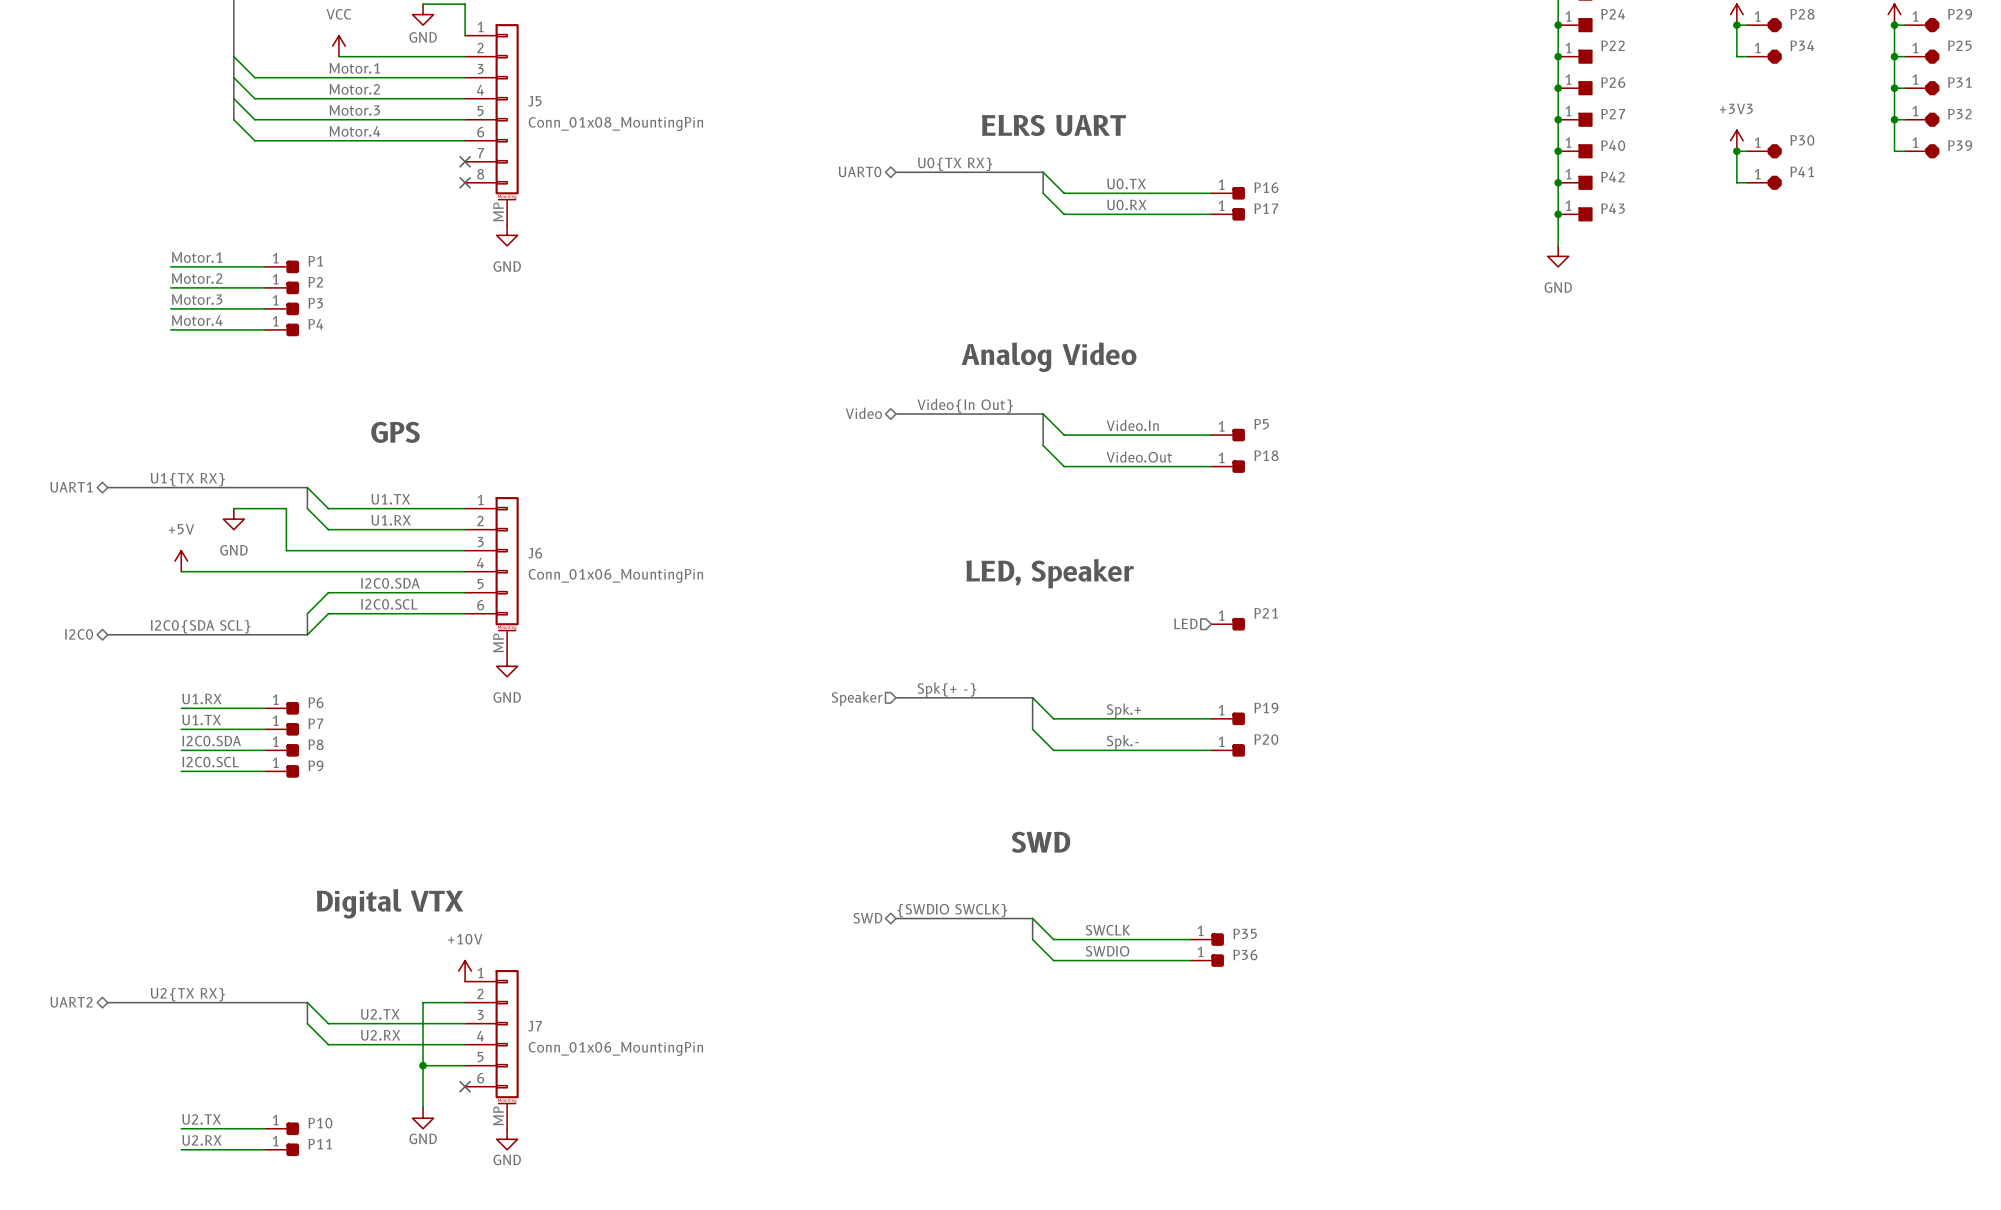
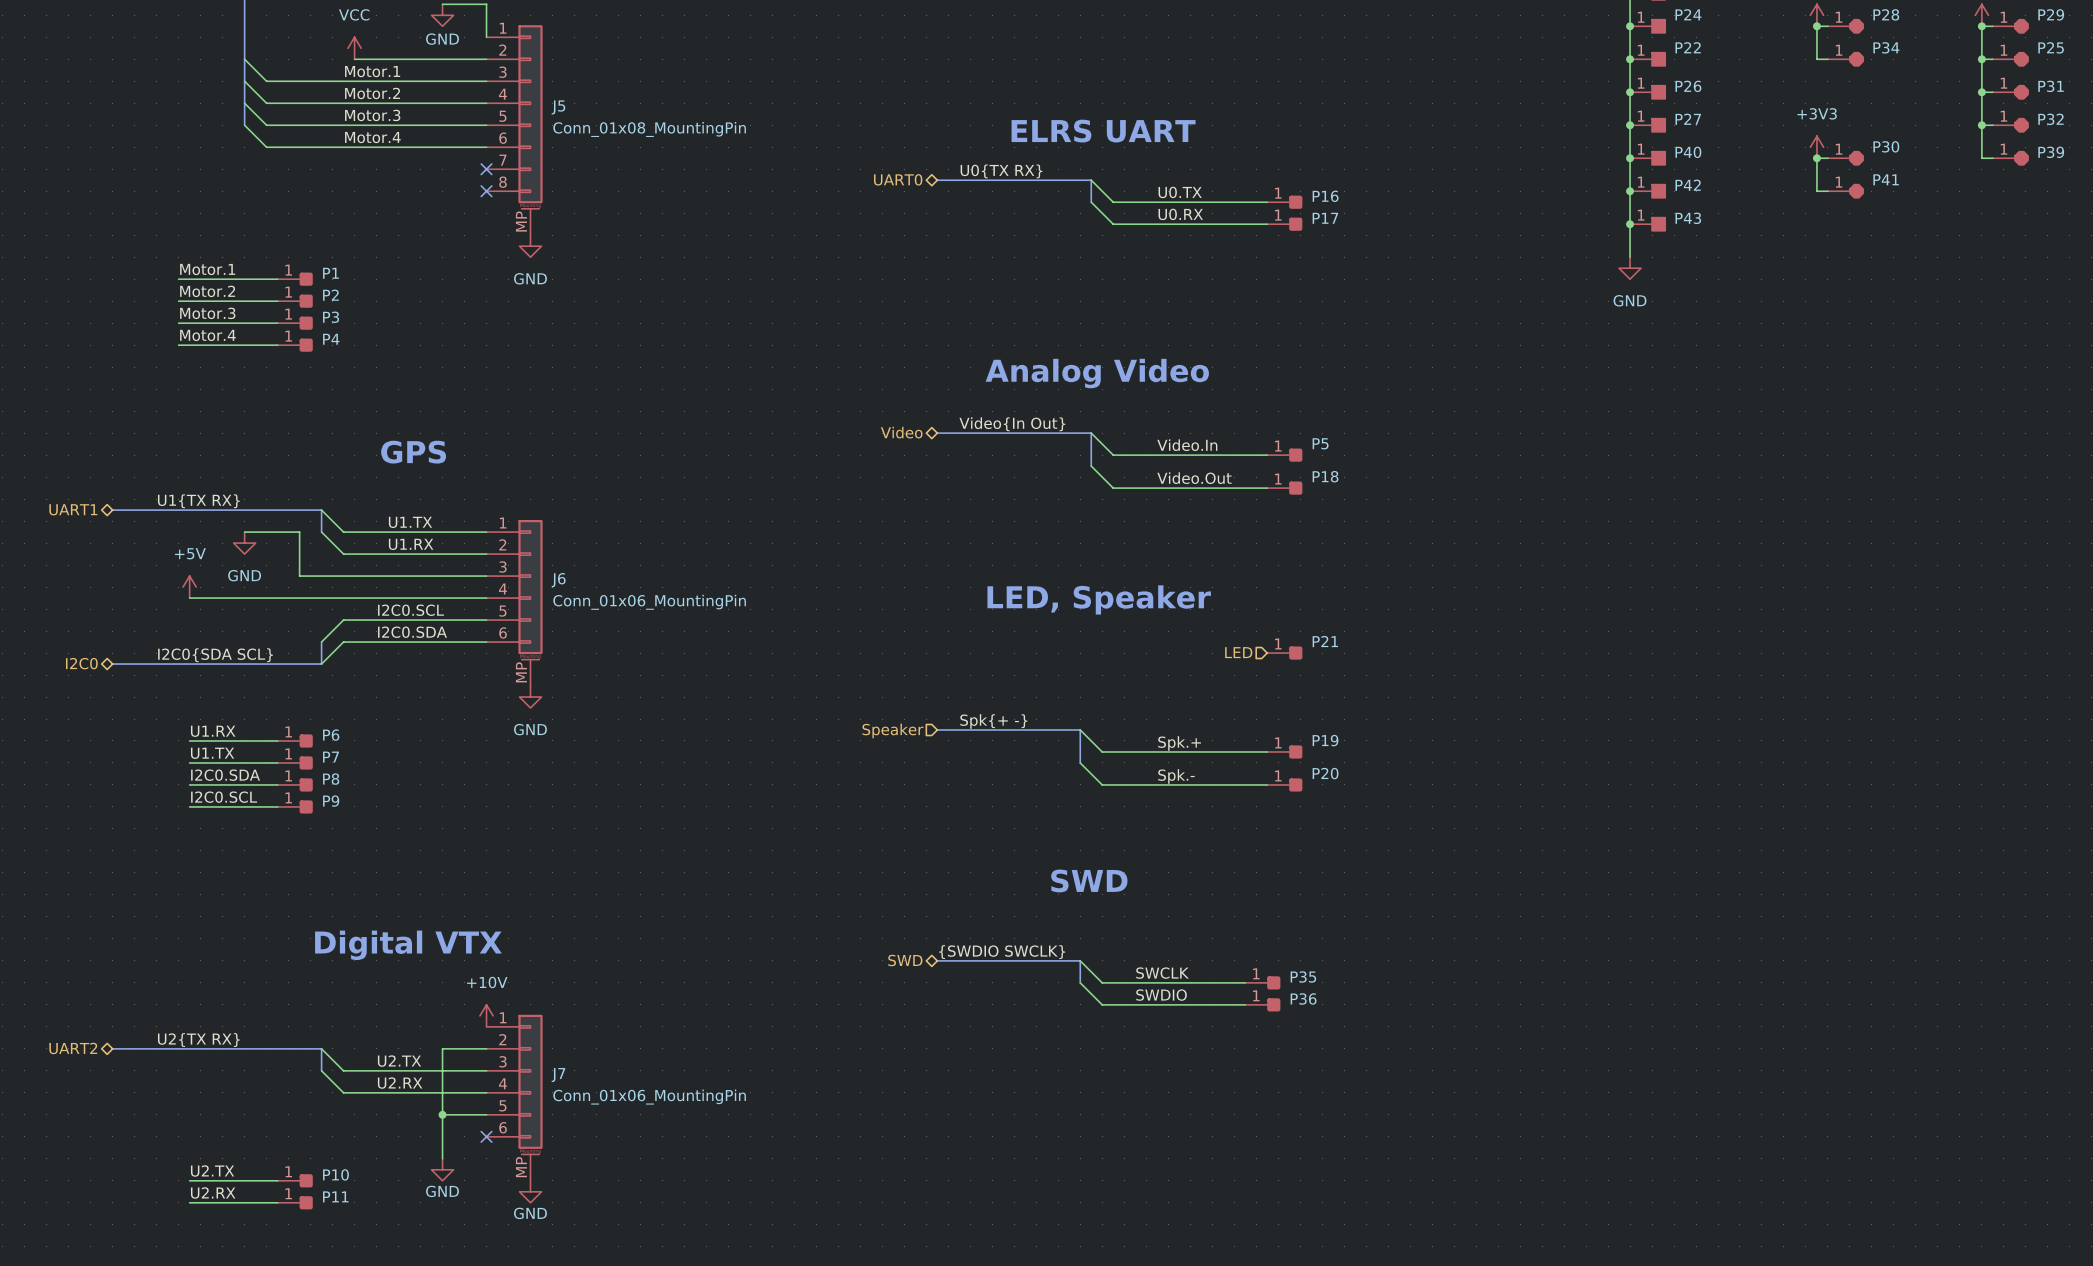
label: I2C0.SDA (390, 583) -> I2C0.SCL (411, 610)
label: I2C0.SCL (389, 604) -> I2C0.SDA (412, 632)

